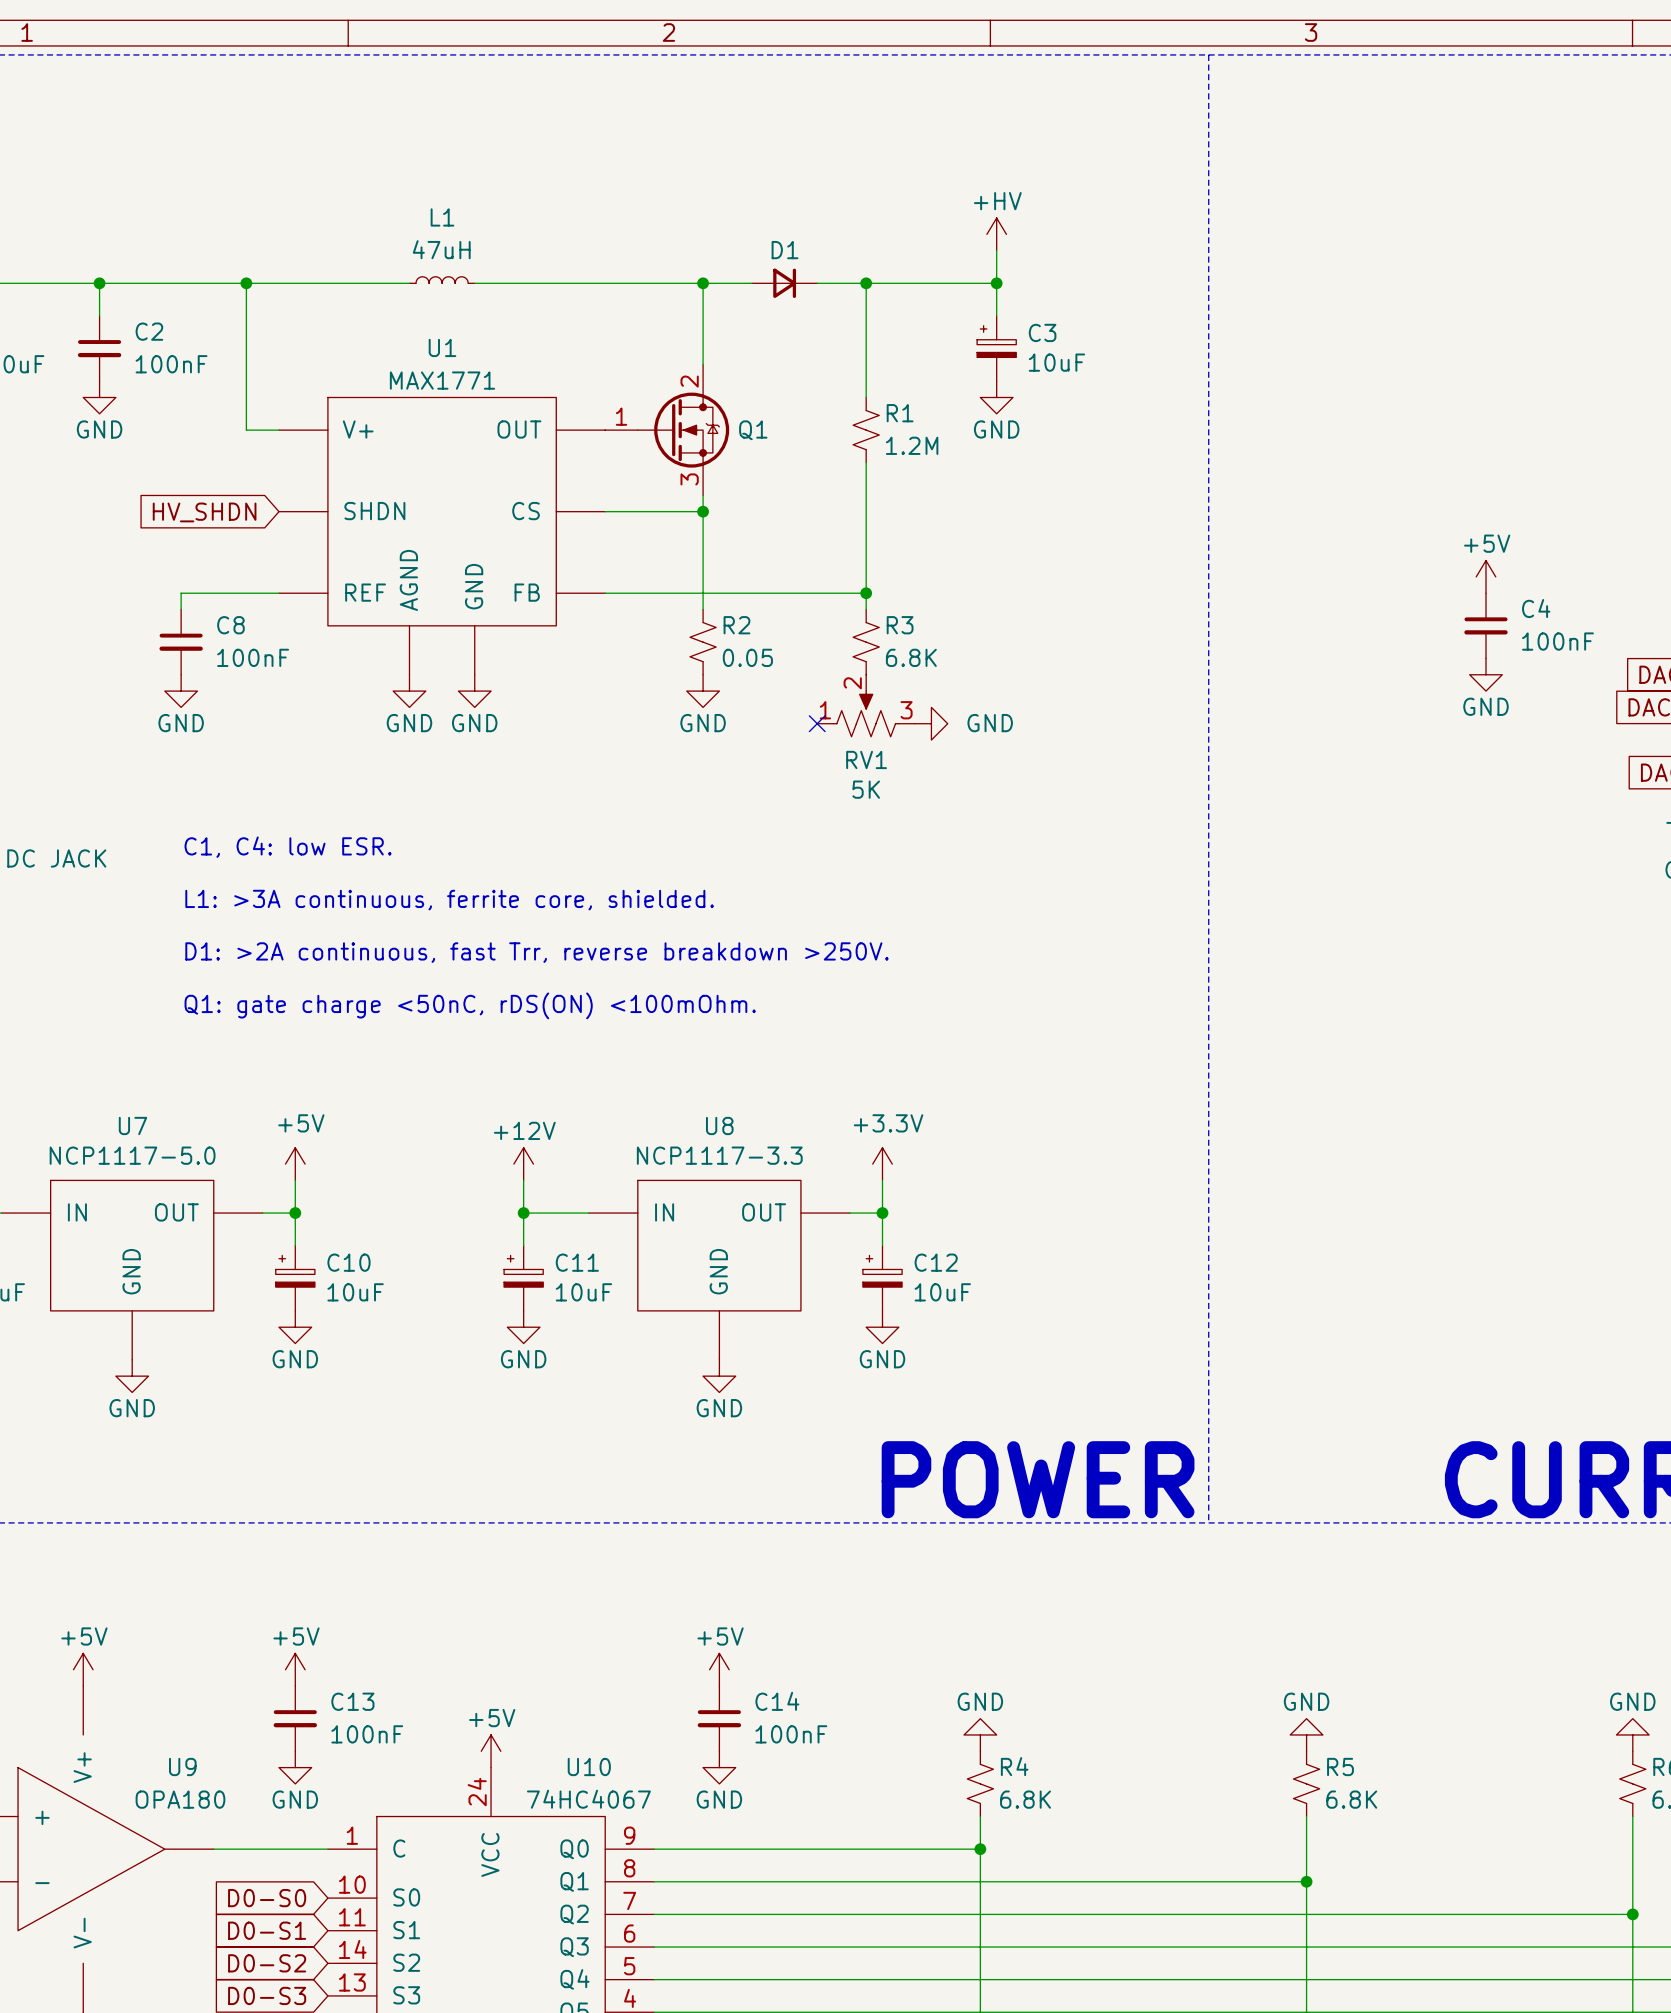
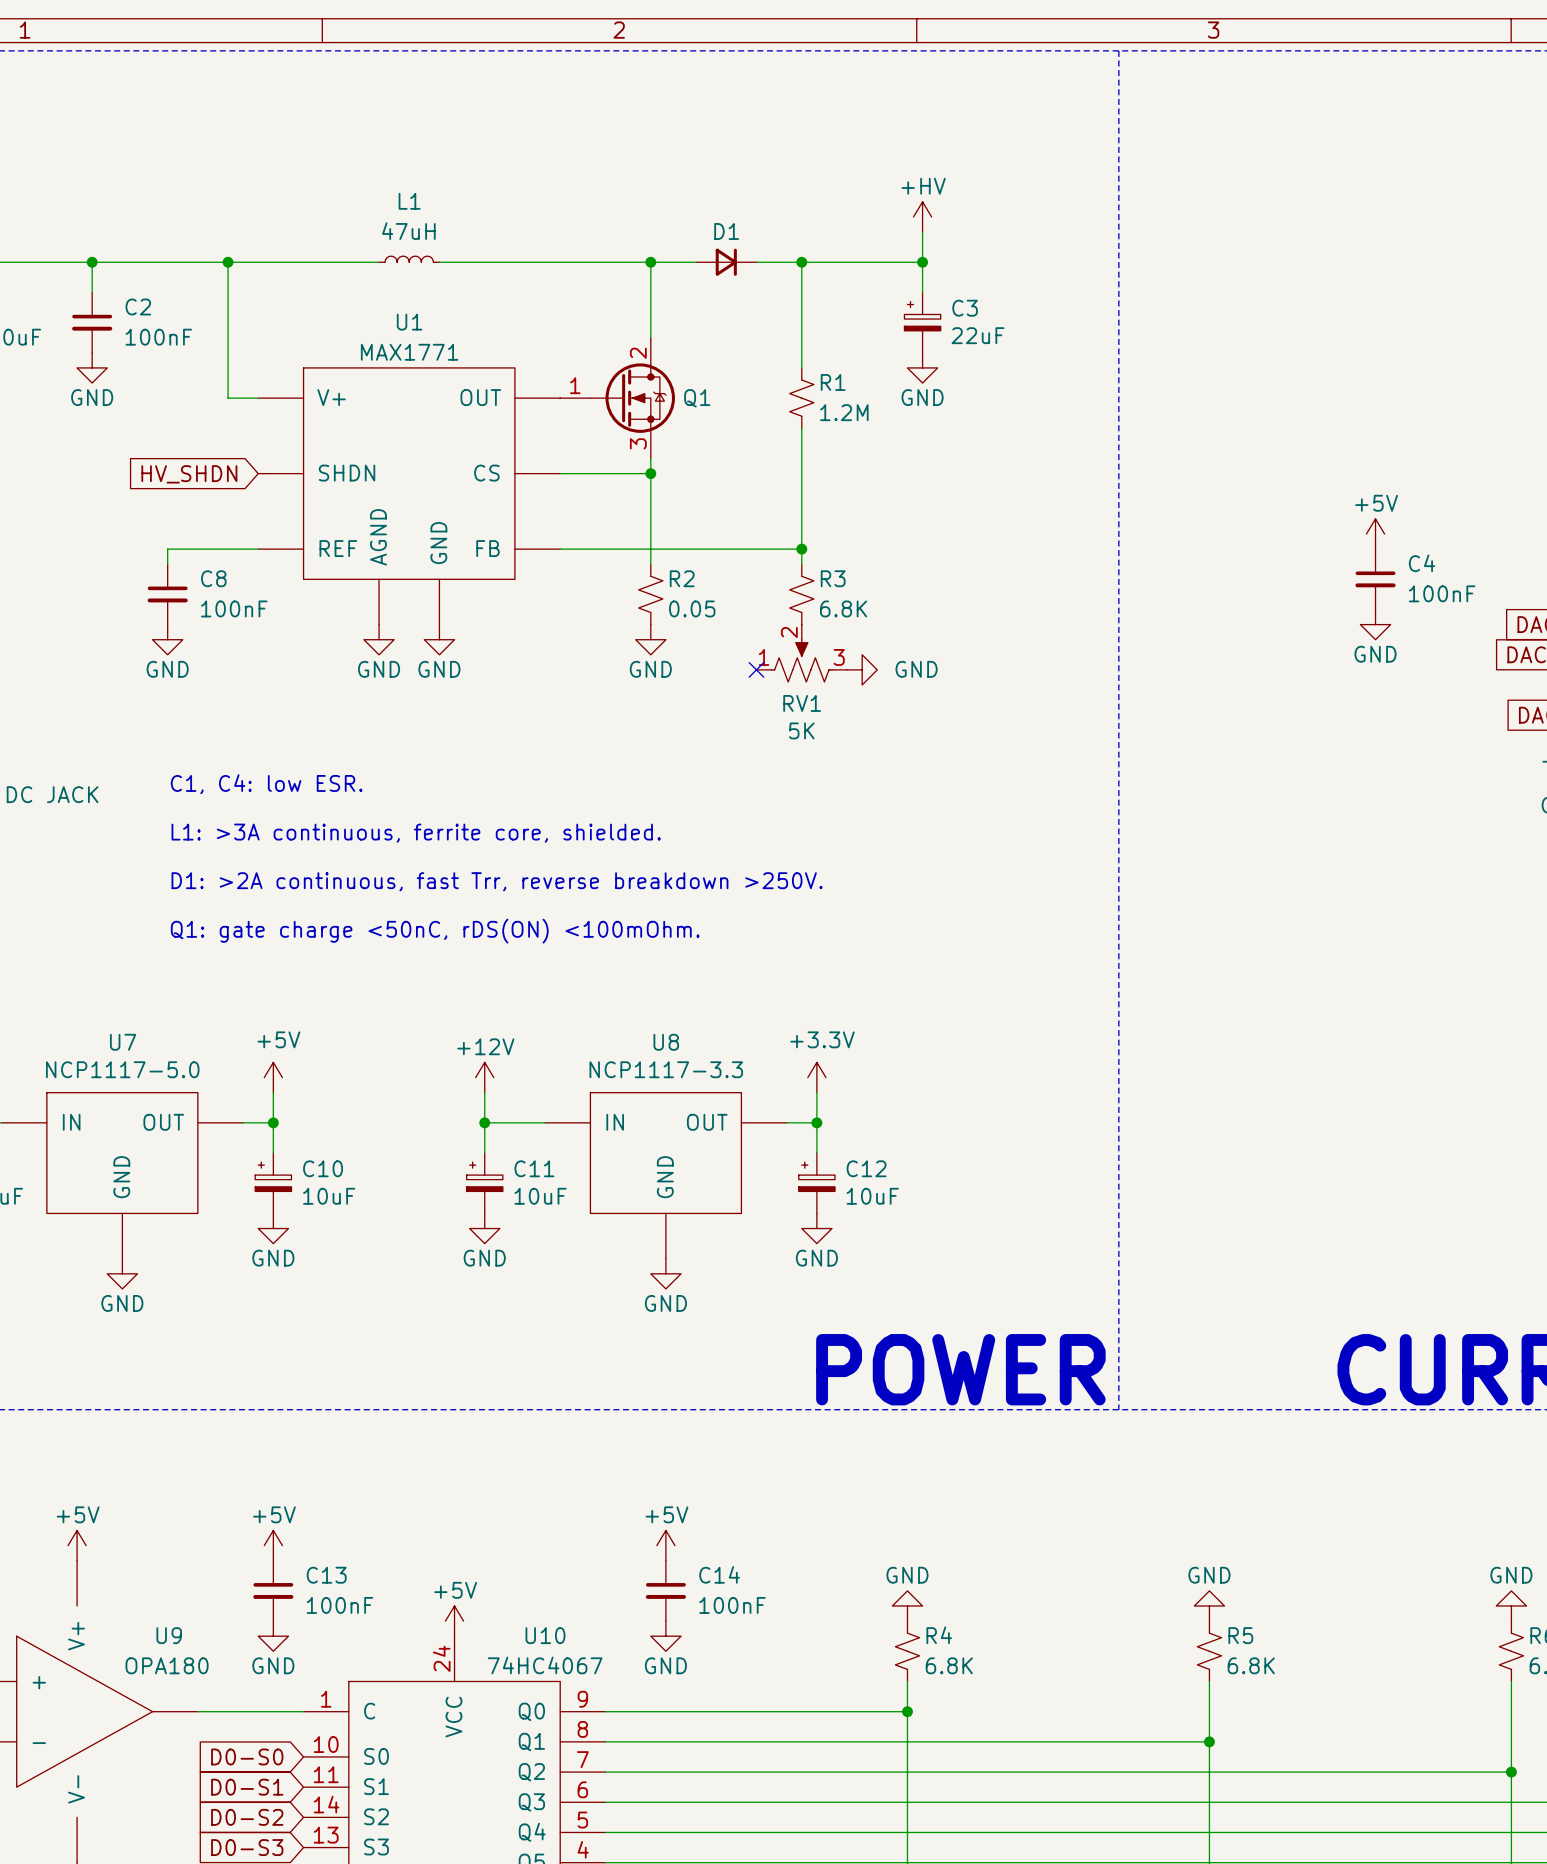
C3 value: 10uF (1056, 362) -> 22uF (978, 335)

